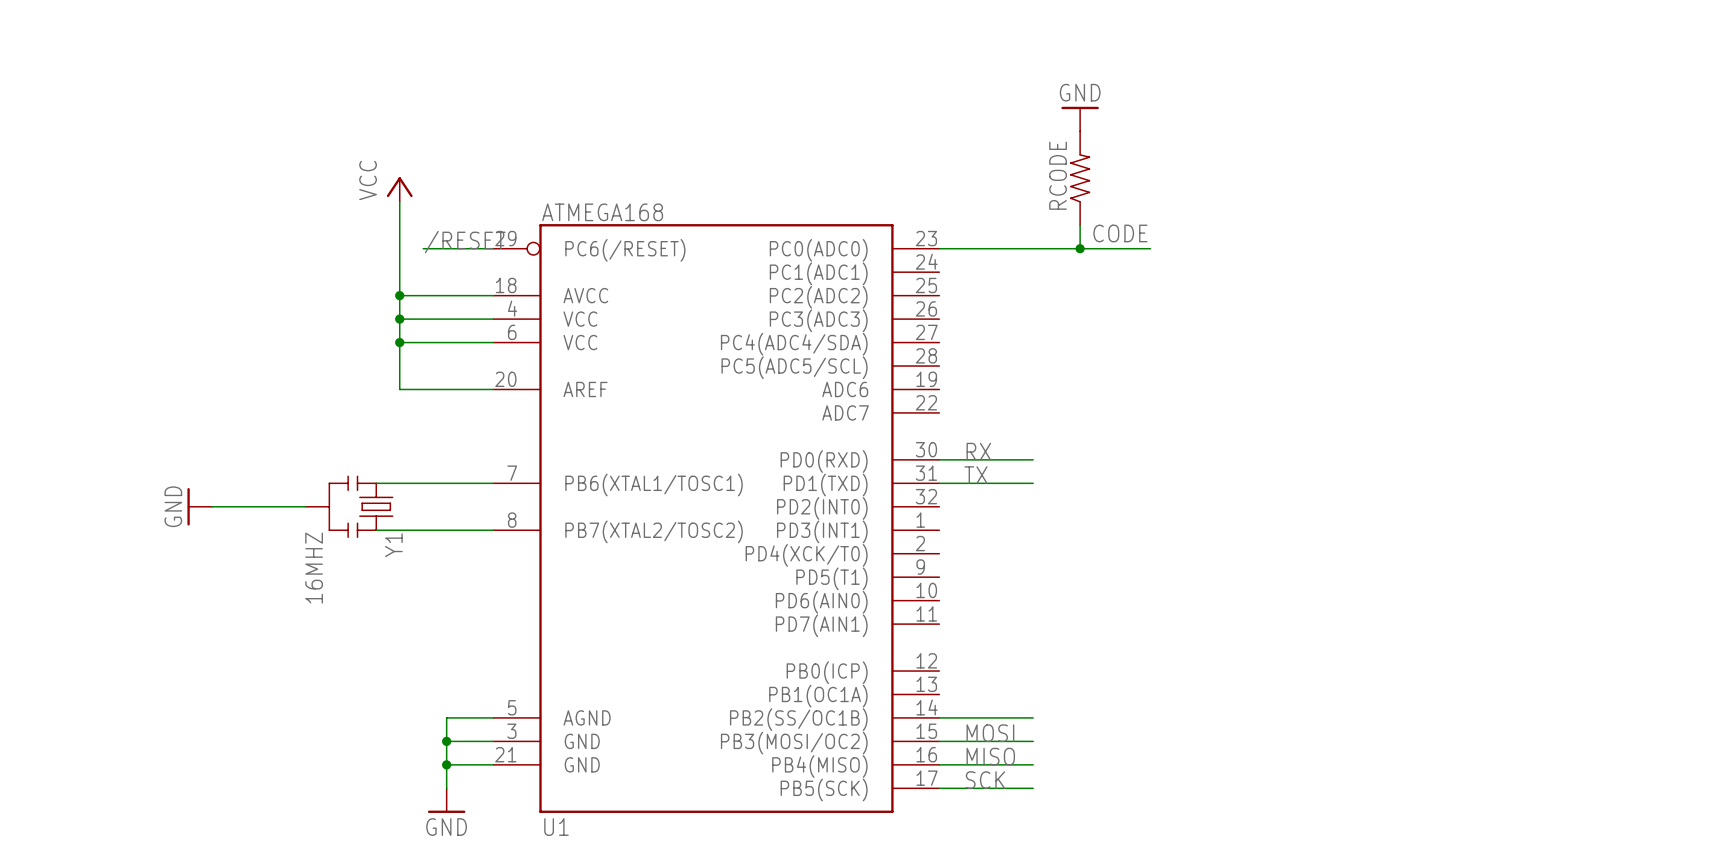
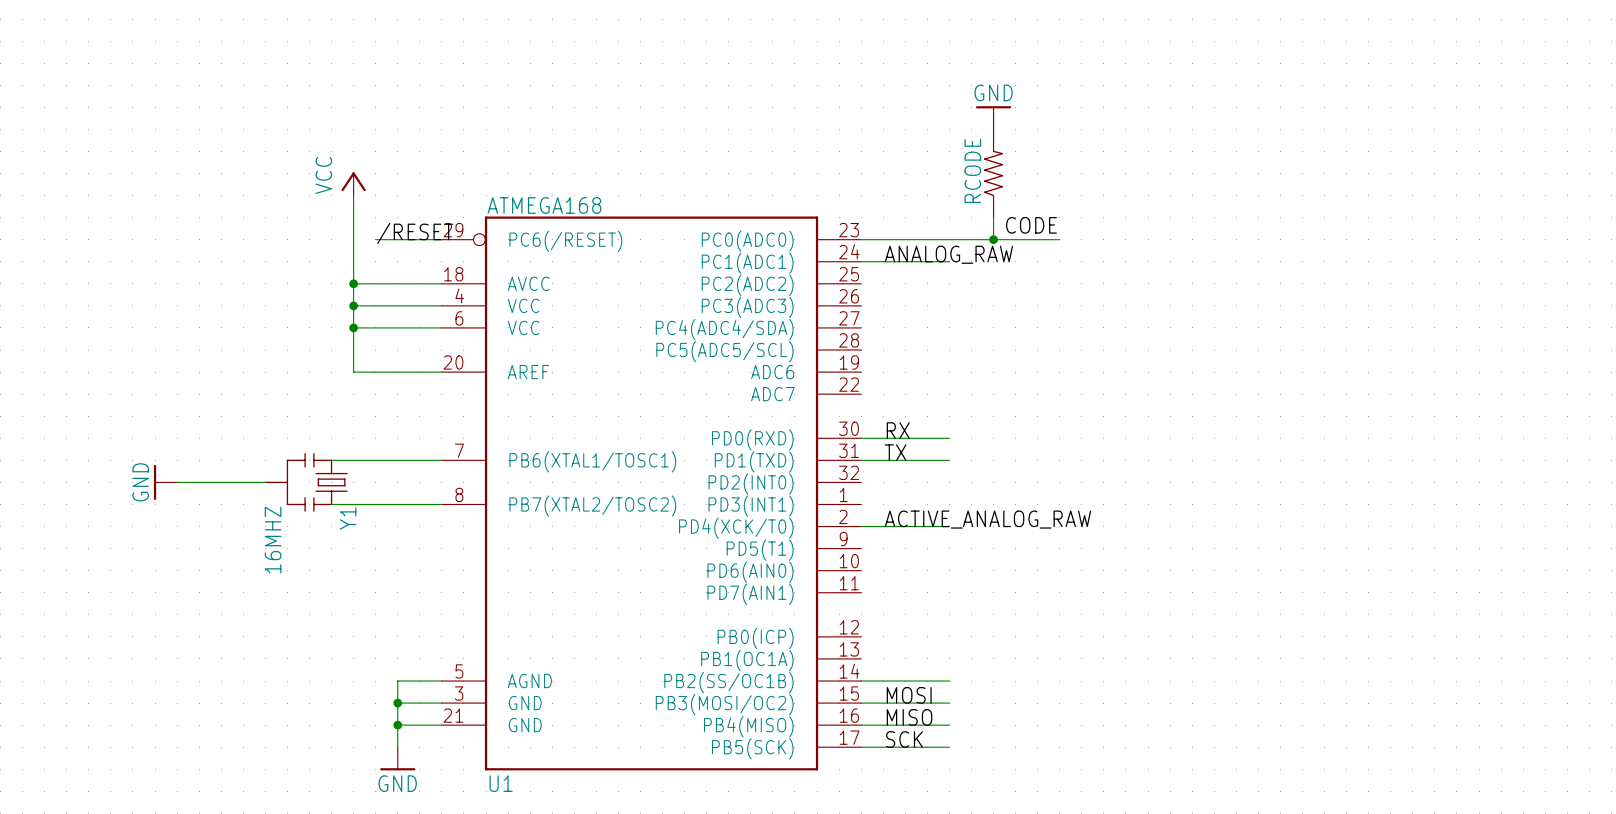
label: none -> ANALOG_RAW (948, 254)
wire: none -> (861, 261) (949, 261)
label: none -> ACTIVE_ANALOG_RAW (987, 519)
wire: none -> (861, 526) (949, 526)

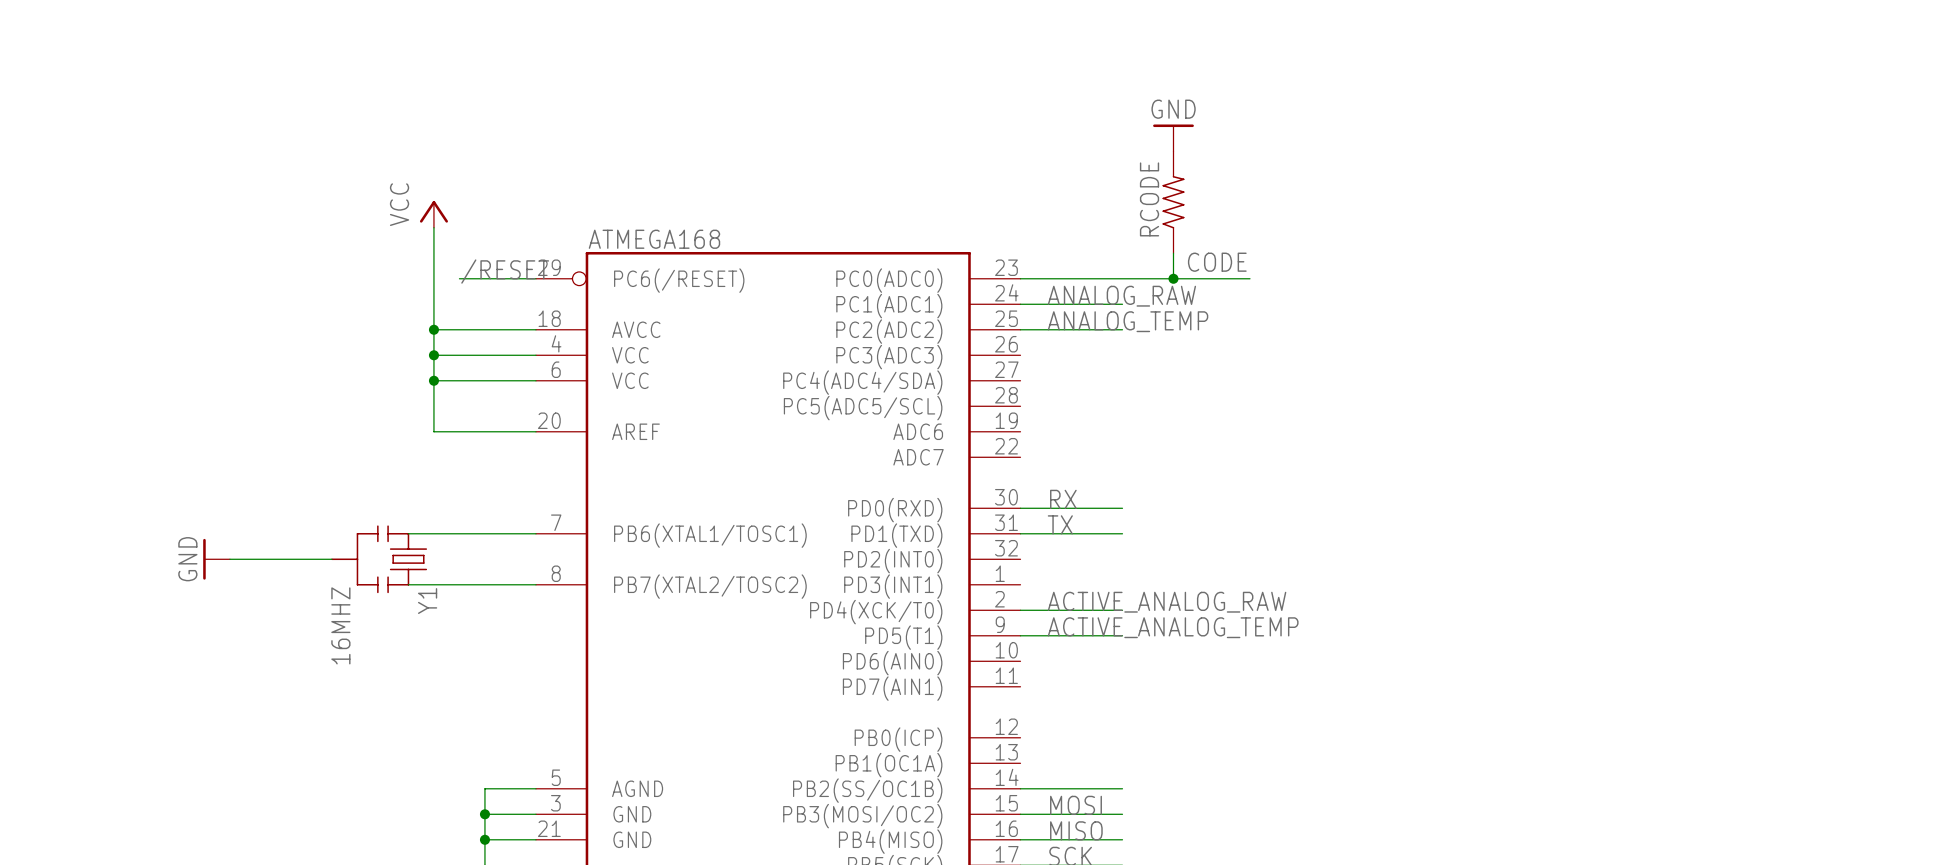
label: none -> ANALOG_TEMP (1128, 321)
wire: none -> (1020, 329) (1122, 329)
label: none -> ACTIVE_ANALOG_TEMP (1173, 627)
wire: none -> (1020, 635) (1122, 635)

